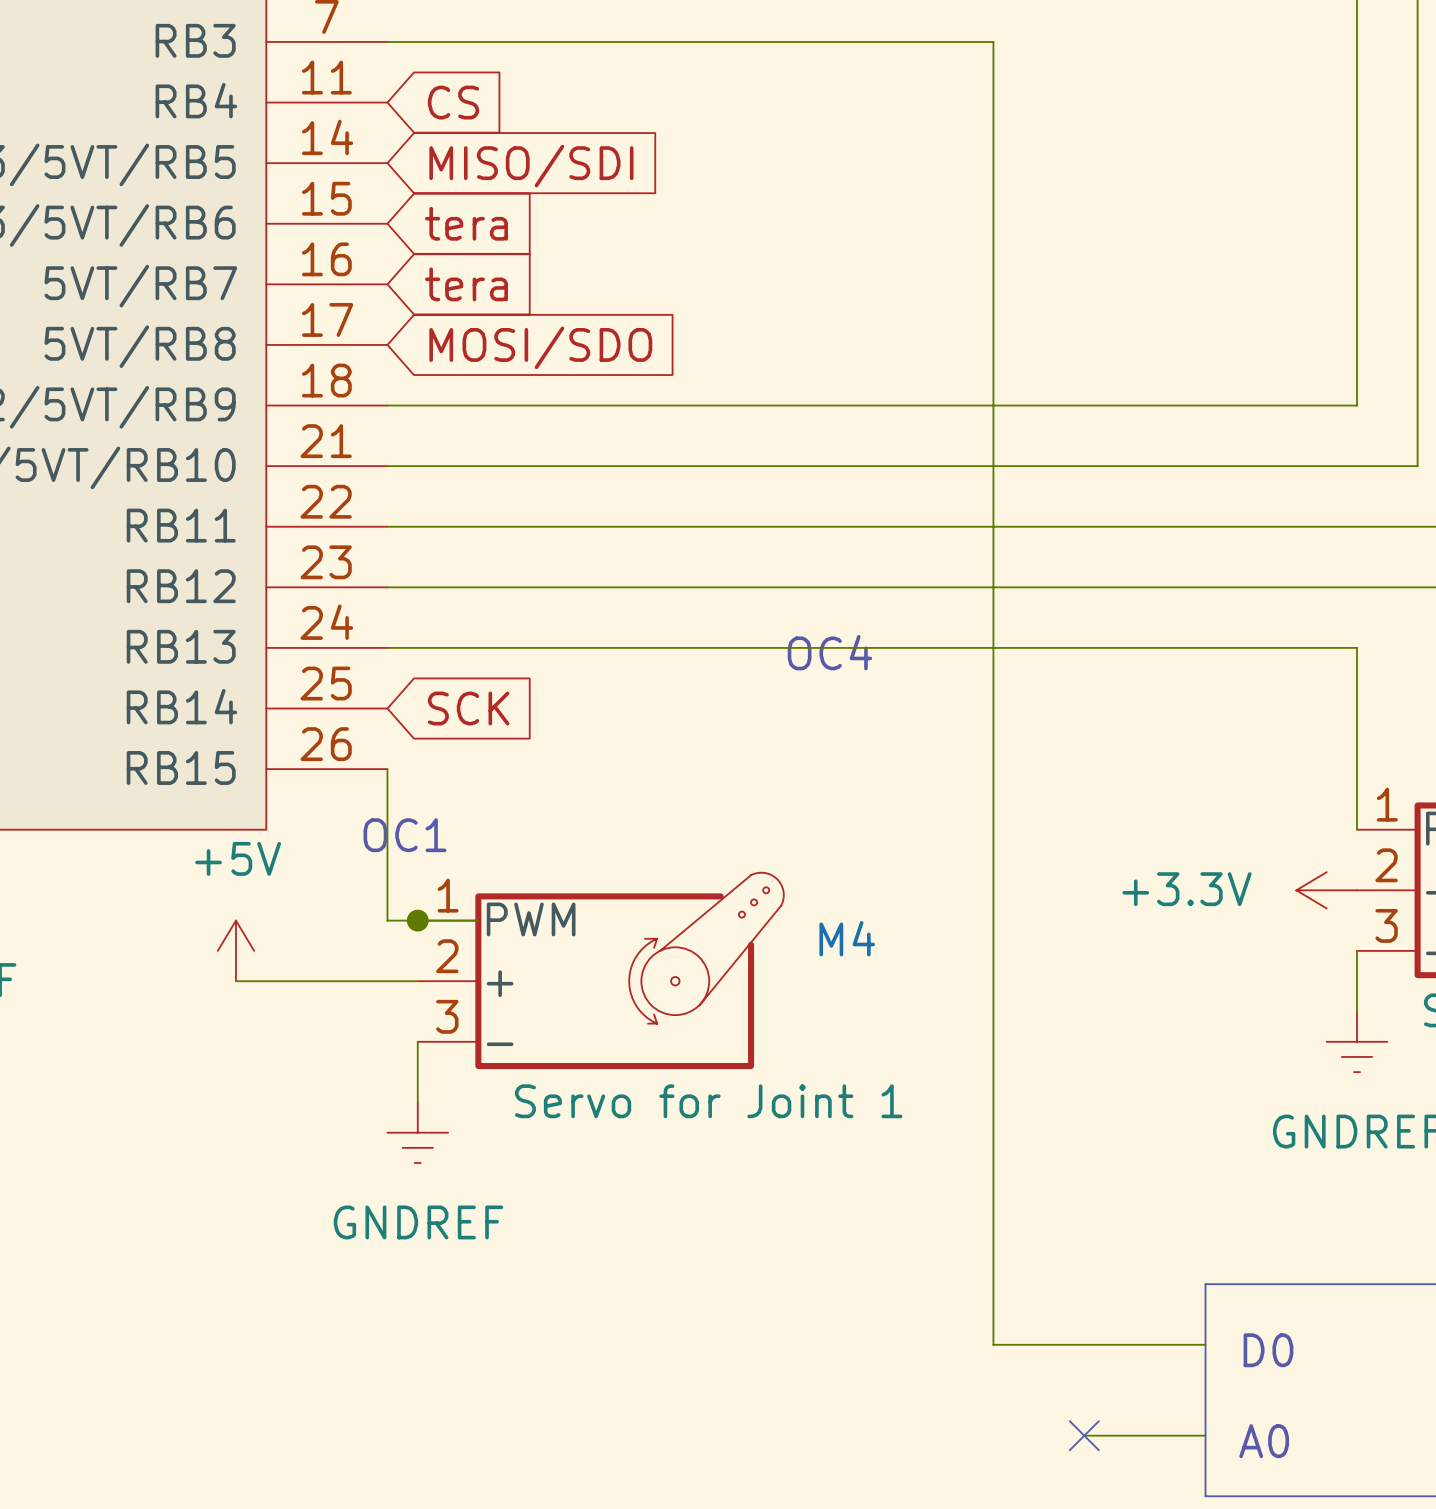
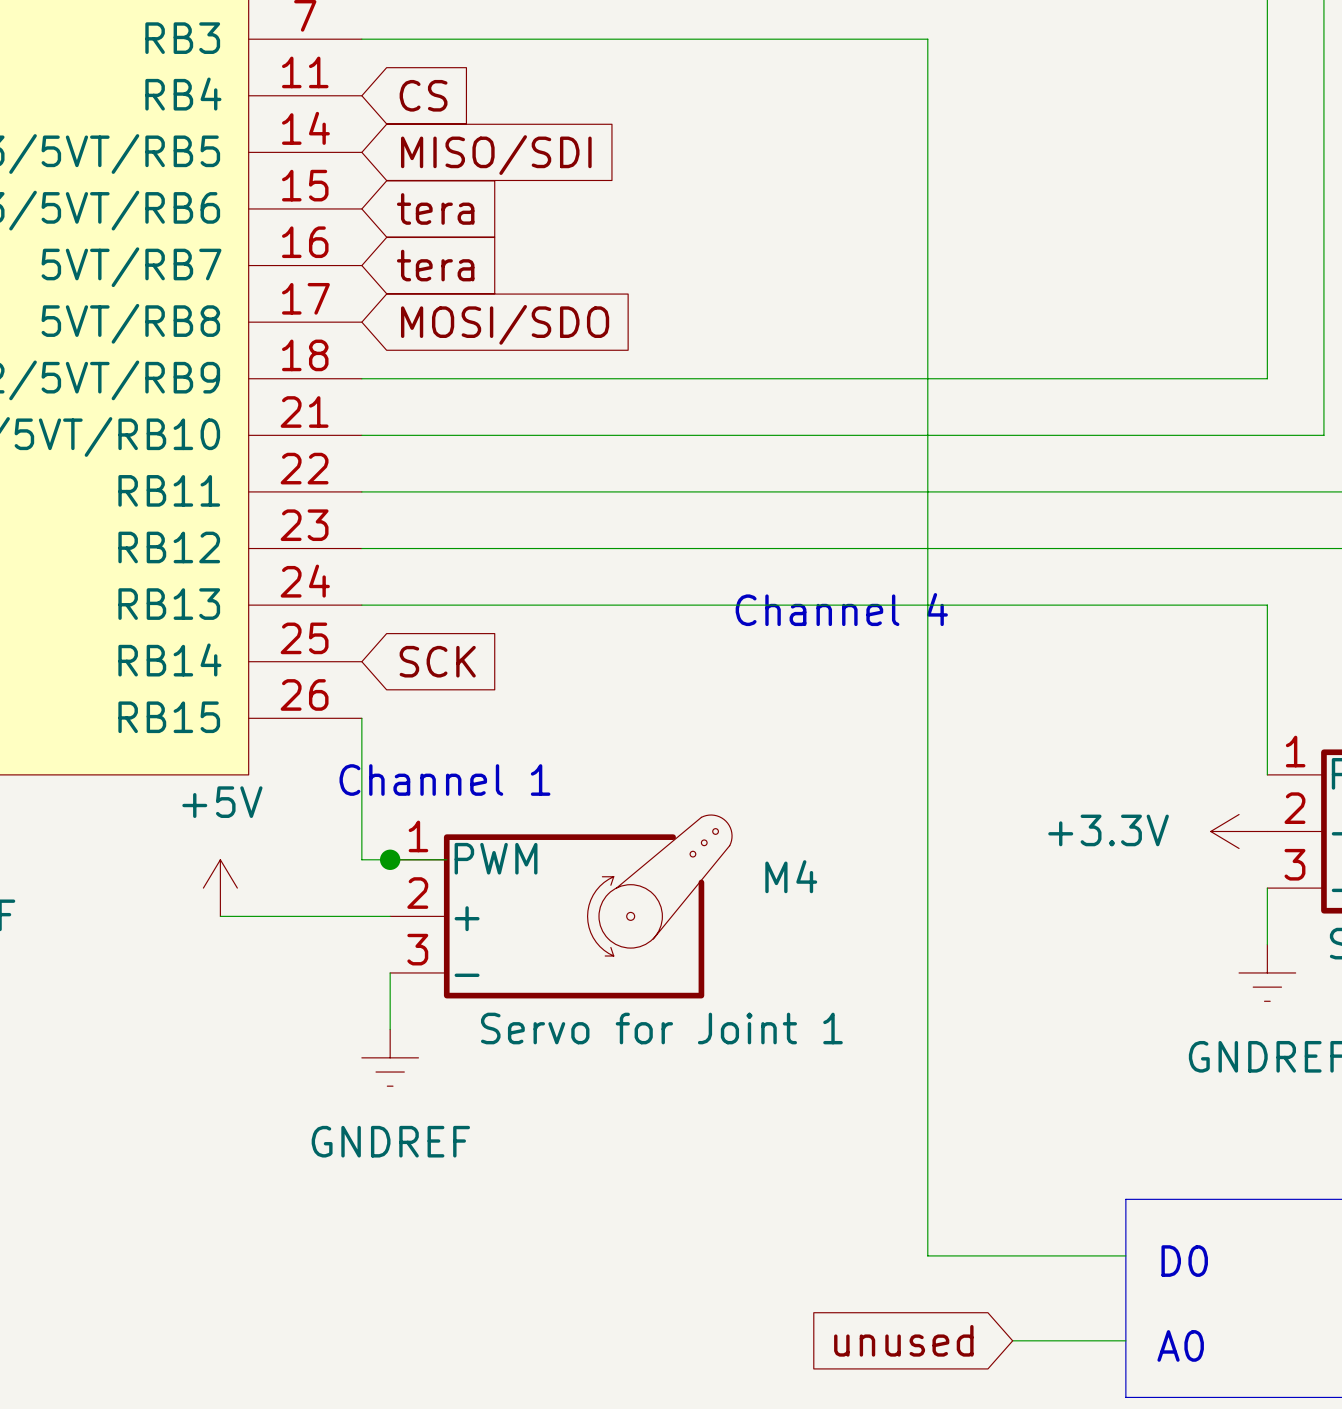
text: OC4 (829, 652) -> Channel 4 (841, 609)
text: OC1 (405, 835) -> Channel 1 (444, 780)
global label: none -> unused (903, 1340)
no-connect mark: (1084, 1435) -> none

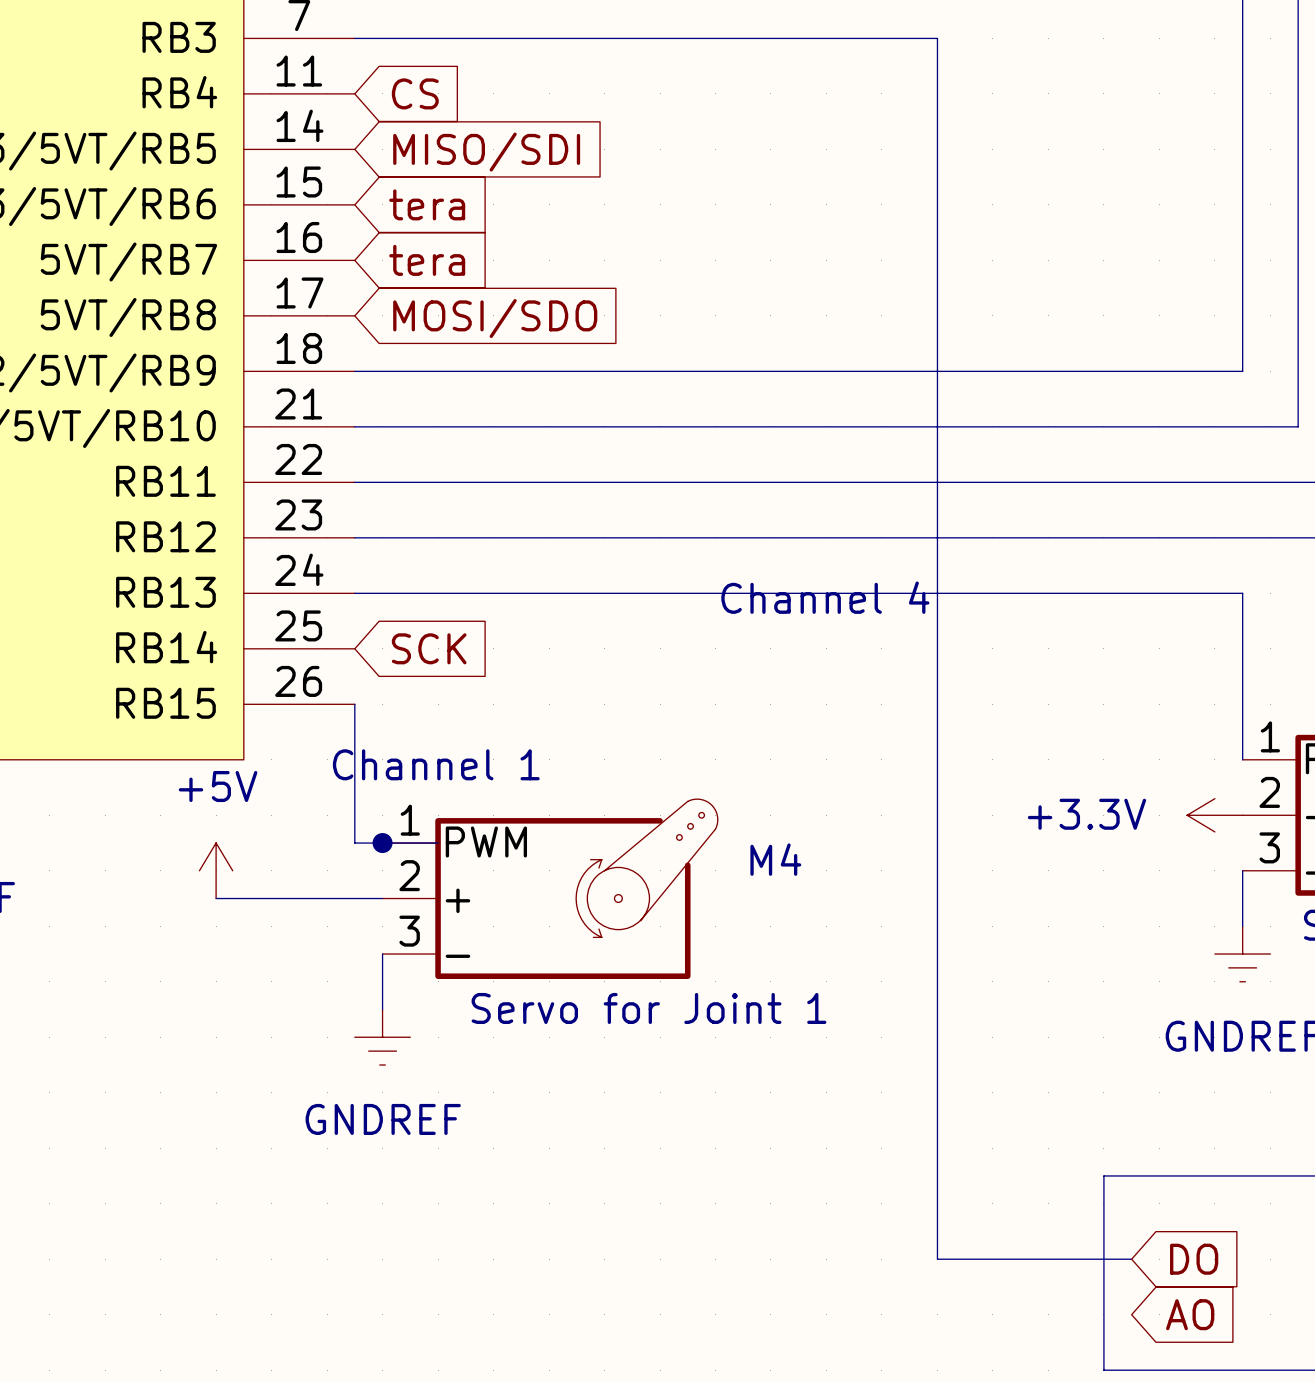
wire: (927, 39) (927, 1255) (1125, 1255) -> (909, 38) (937, 38) (937, 1259) (1131, 1259)
text: D0 (1184, 1261) -> none
global label: none -> DO (1194, 1259)
global label: unused (903, 1340) -> none
wire: (1012, 1340) (1125, 1340) -> none
global label: none -> AO (1190, 1314)
text: A0 (1180, 1345) -> none

